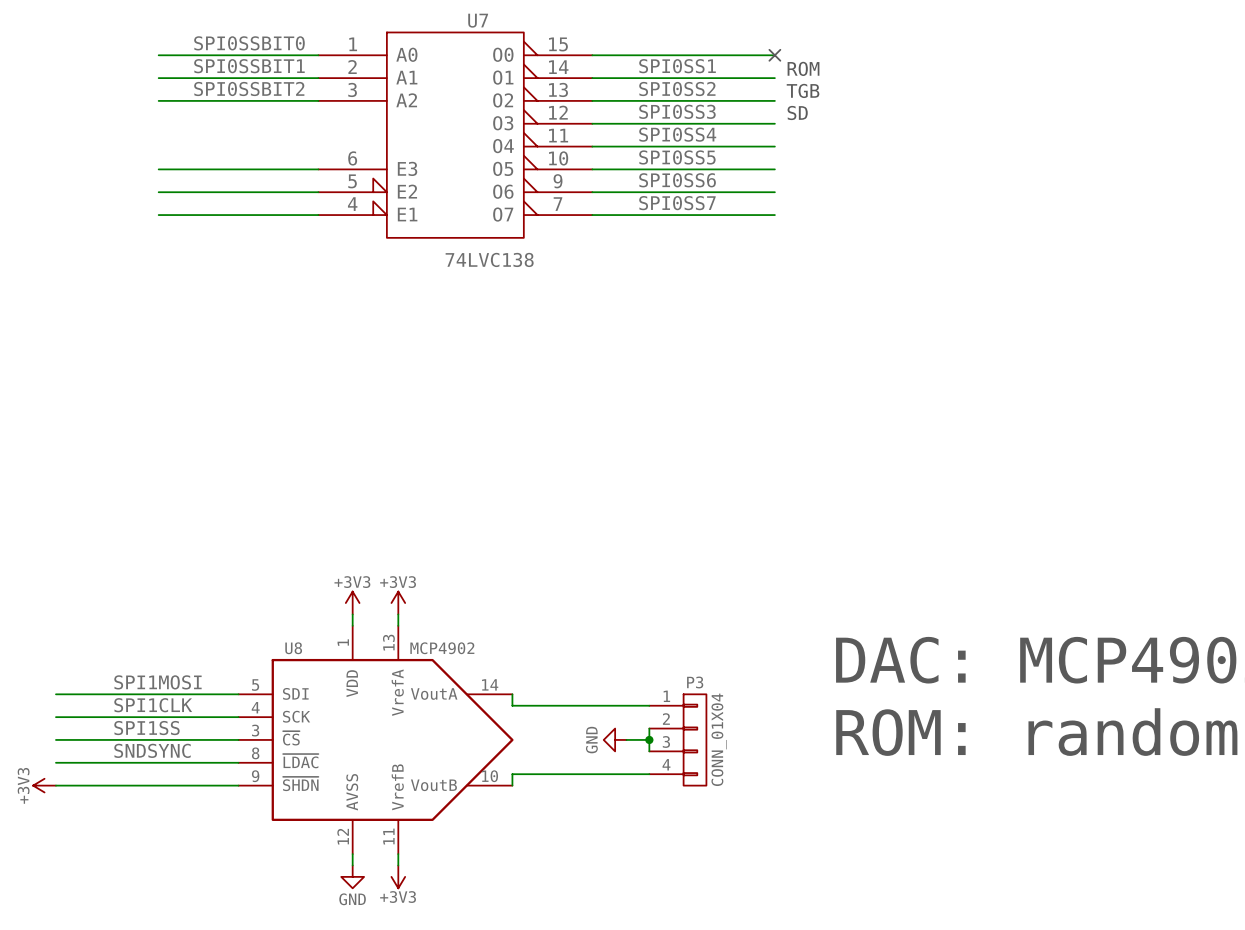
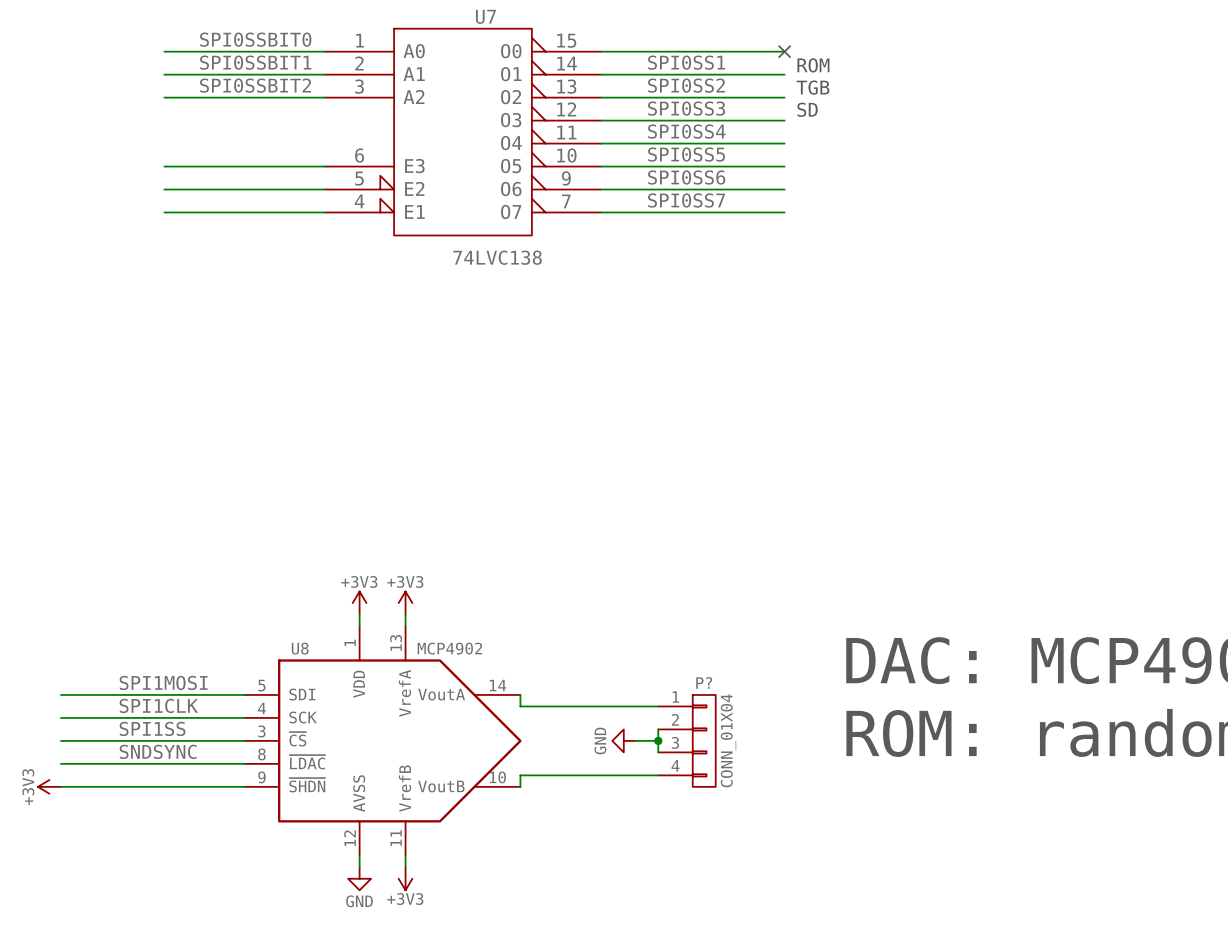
P3 name: P3 (695, 682) -> P? (704, 682)

